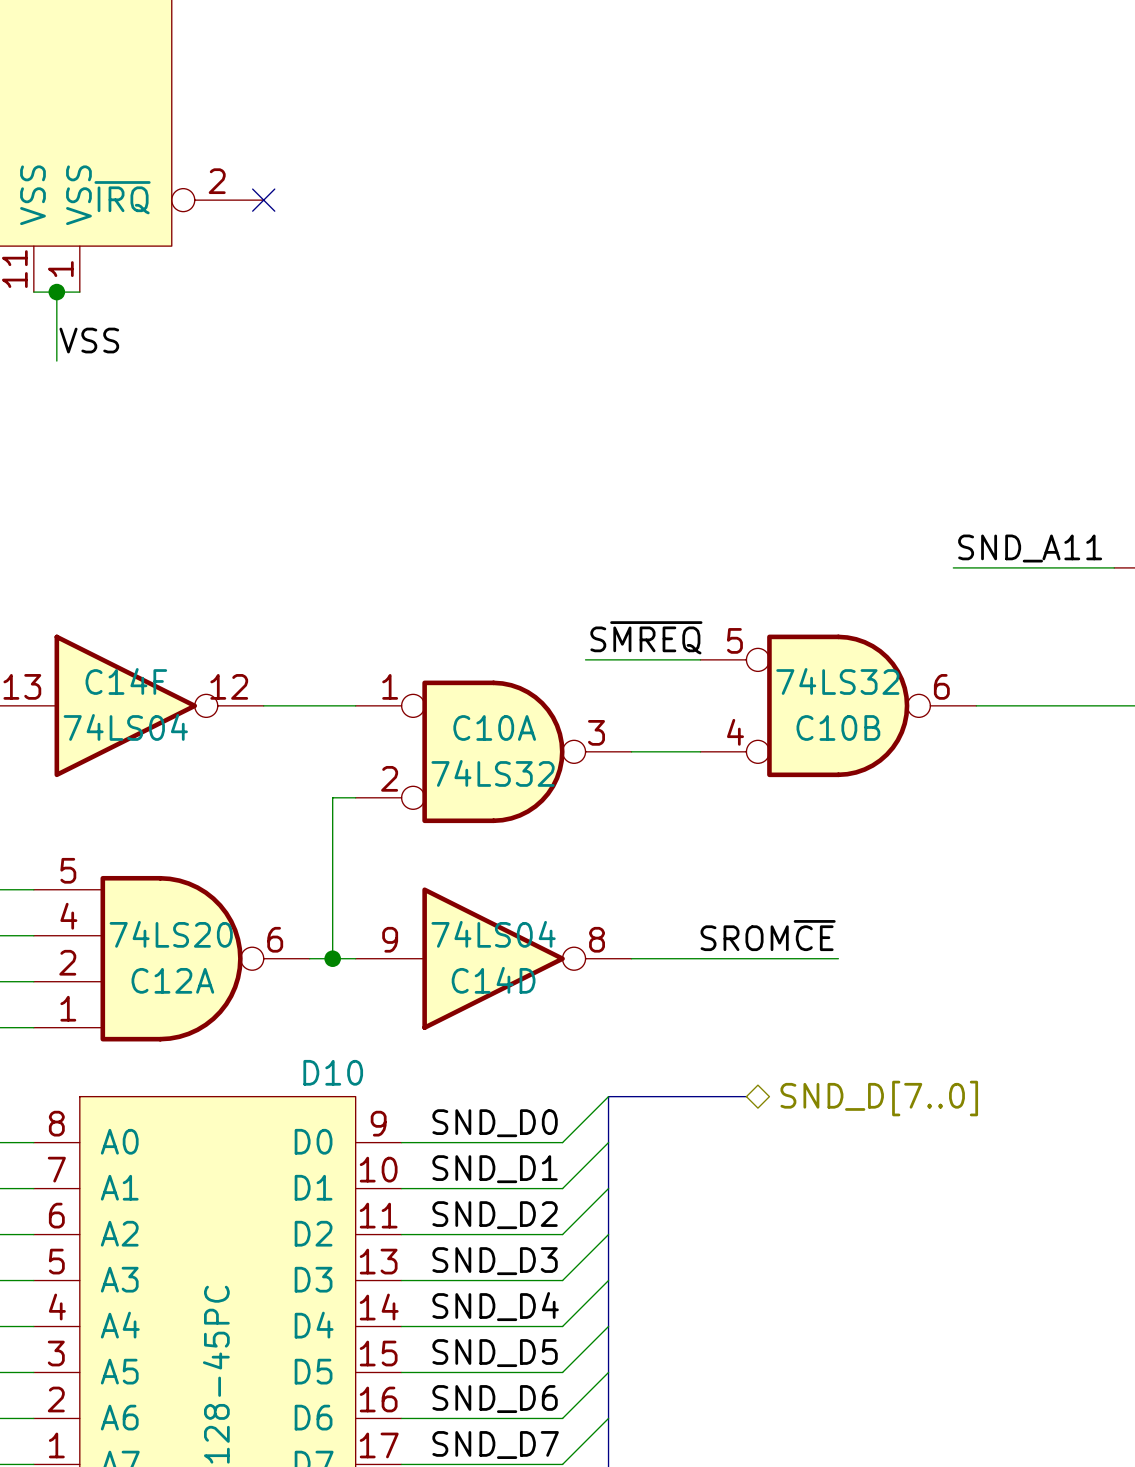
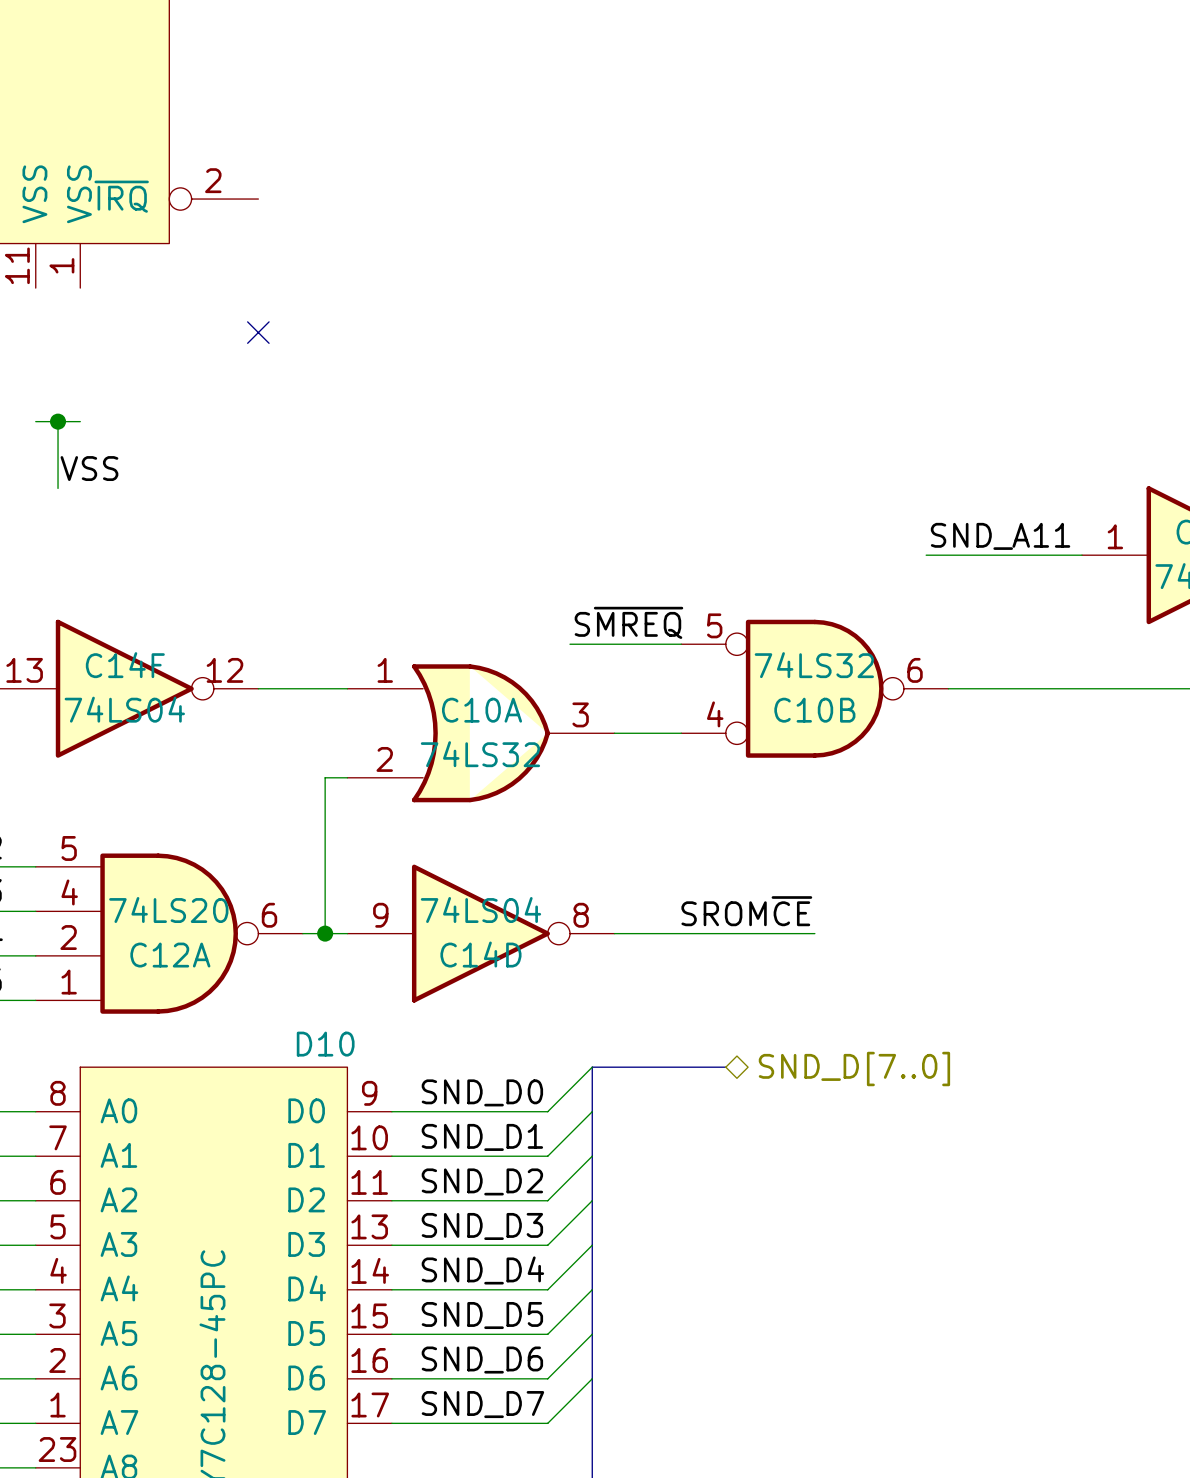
no-connect mark: (263, 200) -> none
wire: (33, 292) (79, 292) -> (35, 421) (80, 421)
wire: (56, 292) (56, 361) -> (58, 421) (58, 488)
junction: (56, 292) -> none
no-connect mark: none -> (258, 332)
label position: VSS (89, 340) -> VSS (89, 468)
junction: none -> (58, 421)
C10A symbol: [355, 680, 632, 824] -> [347, 664, 615, 803]

